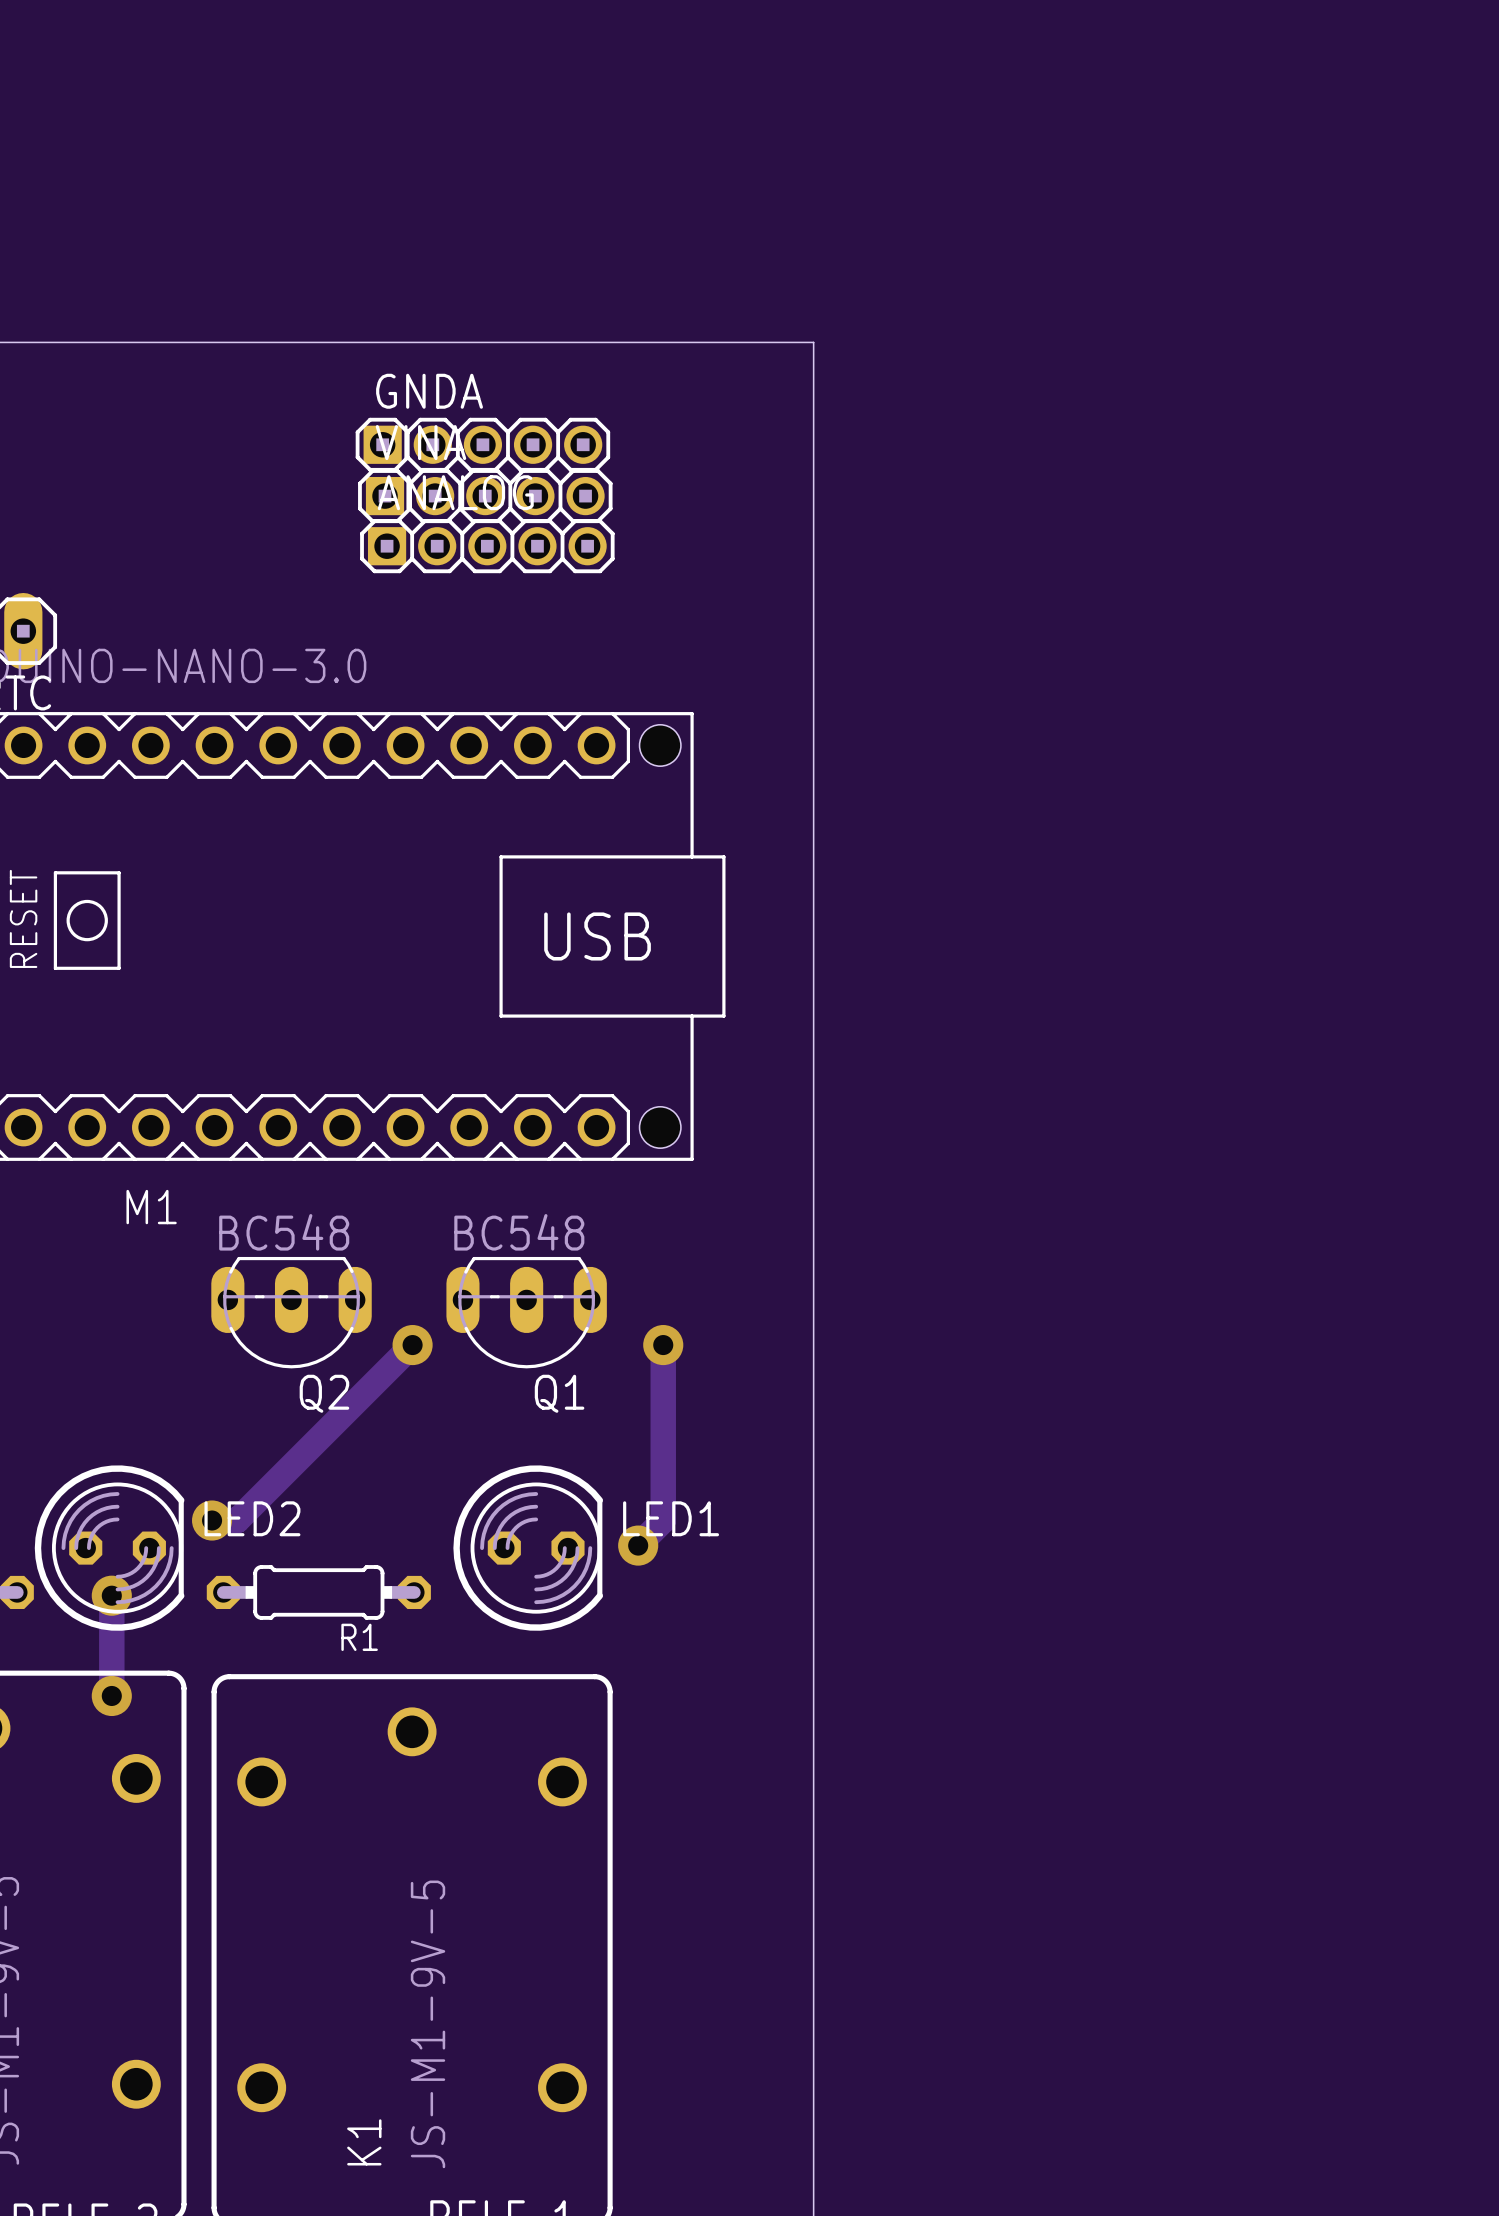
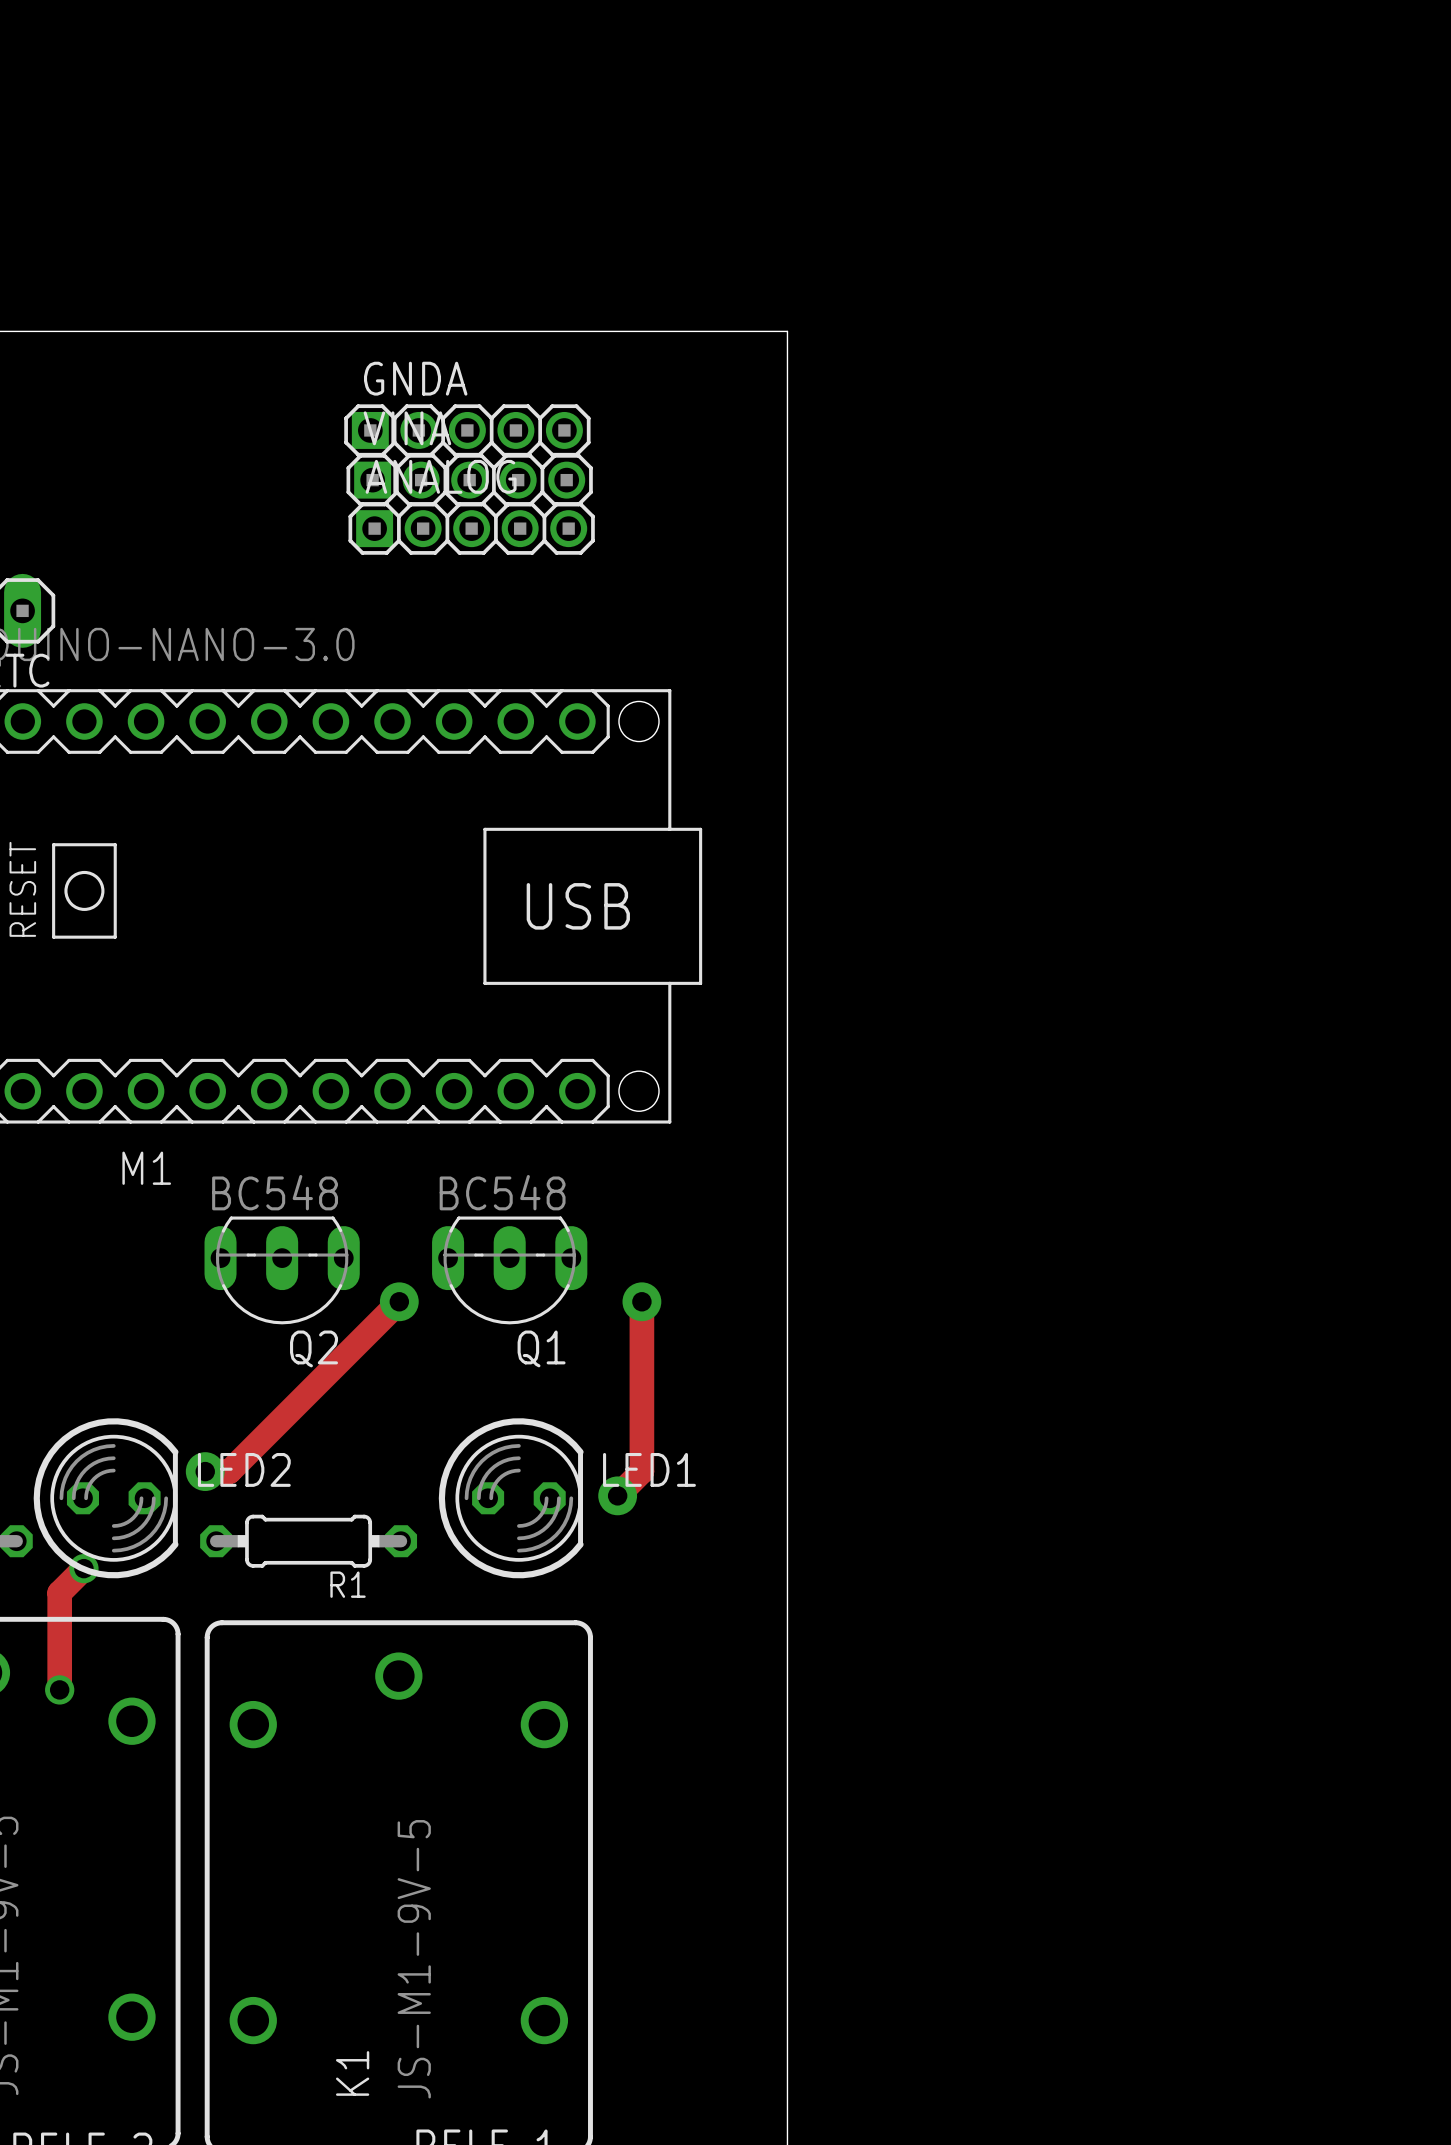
track: (111, 1595) (111, 1695) -> none
via: (111, 1595) -> none
track: none -> (83, 1568) (59, 1592) (59, 1689)
via: none -> (83, 1568)
via: (111, 1695) -> none
via: none -> (59, 1689)

